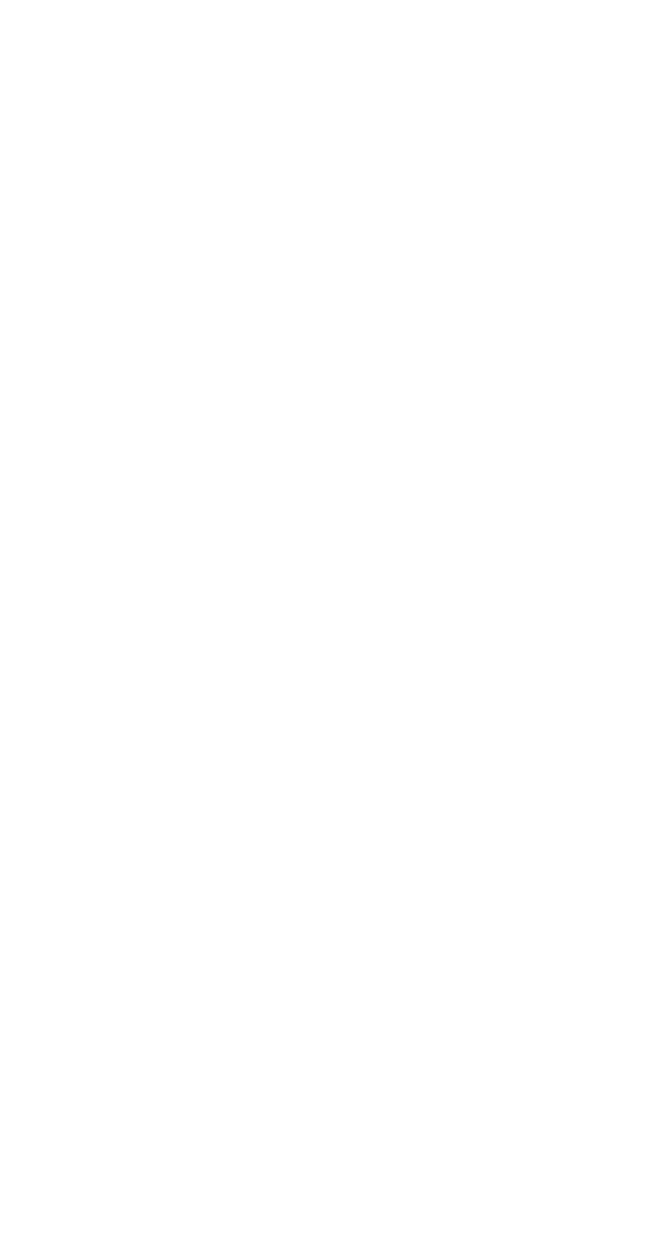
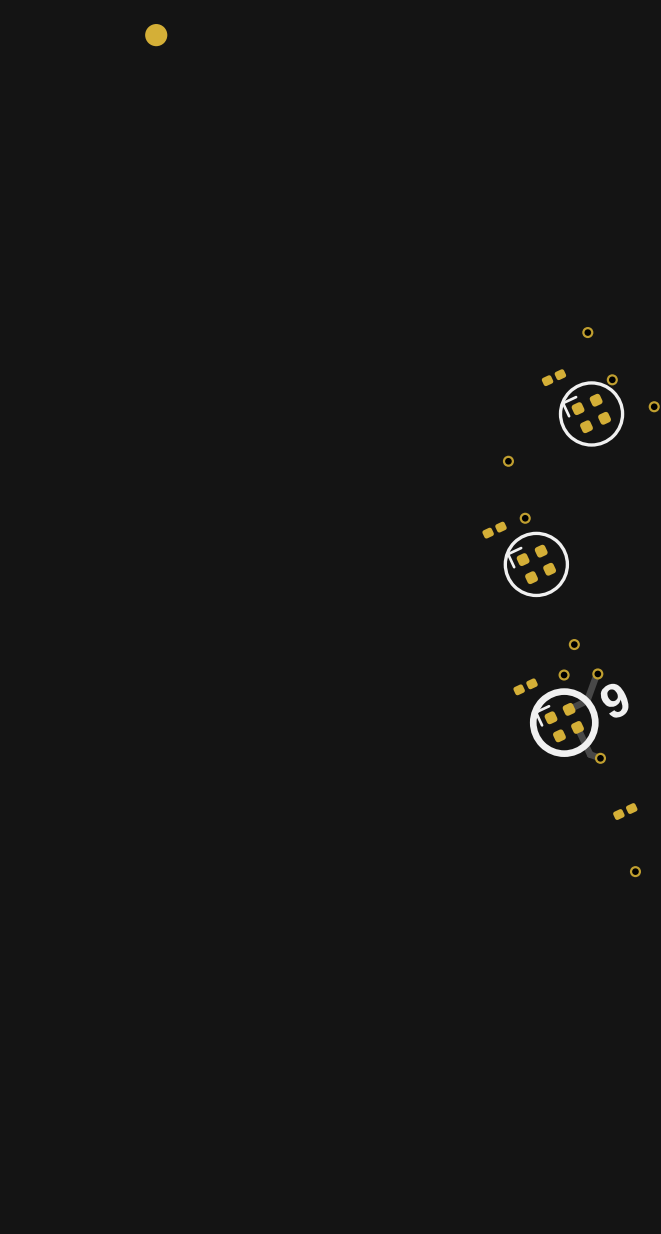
part: none -> (156, 35)
via: none -> (587, 332)
part: none -> (553, 377)
via: none -> (612, 379)
drawing: none -> [558, 381, 625, 447]
via: none -> (654, 406)
part: none -> (586, 413)
via: none -> (508, 461)
via: none -> (525, 518)
part: none -> (494, 530)
drawing: none -> [503, 531, 570, 598]
part: none -> (531, 564)
via: none -> (574, 644)
track: none -> (597, 673) (587, 700) (569, 709)
via: none -> (597, 673)
via: none -> (564, 675)
part: none -> (525, 686)
drawing: none -> [529, 688, 599, 757]
text: none -> 9 (614, 700)
part: none -> (559, 722)
track: none -> (577, 727) (590, 754) (600, 758)
via: none -> (600, 758)
part: none -> (625, 811)
via: none -> (635, 871)

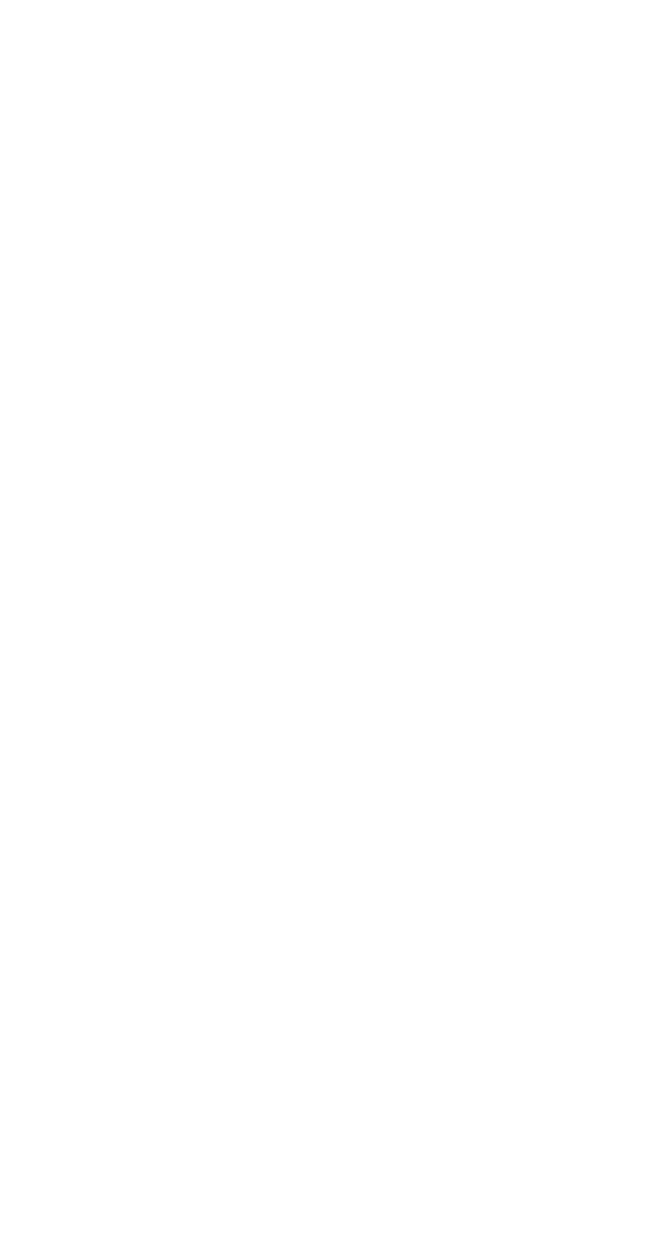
part: (156, 35) -> none
via: (587, 332) -> none
part: (553, 377) -> none
via: (612, 379) -> none
drawing: [558, 381, 625, 447] -> none
via: (654, 406) -> none
part: (586, 413) -> none
via: (508, 461) -> none
via: (525, 518) -> none
part: (494, 530) -> none
drawing: [503, 531, 570, 598] -> none
part: (531, 564) -> none
via: (574, 644) -> none
track: (597, 673) (587, 700) (569, 709) -> none
via: (597, 673) -> none
via: (564, 675) -> none
part: (525, 686) -> none
drawing: [529, 688, 599, 757] -> none
text: 9 (614, 700) -> none
part: (559, 722) -> none
track: (577, 727) (590, 754) (600, 758) -> none
via: (600, 758) -> none
part: (625, 811) -> none
via: (635, 871) -> none

